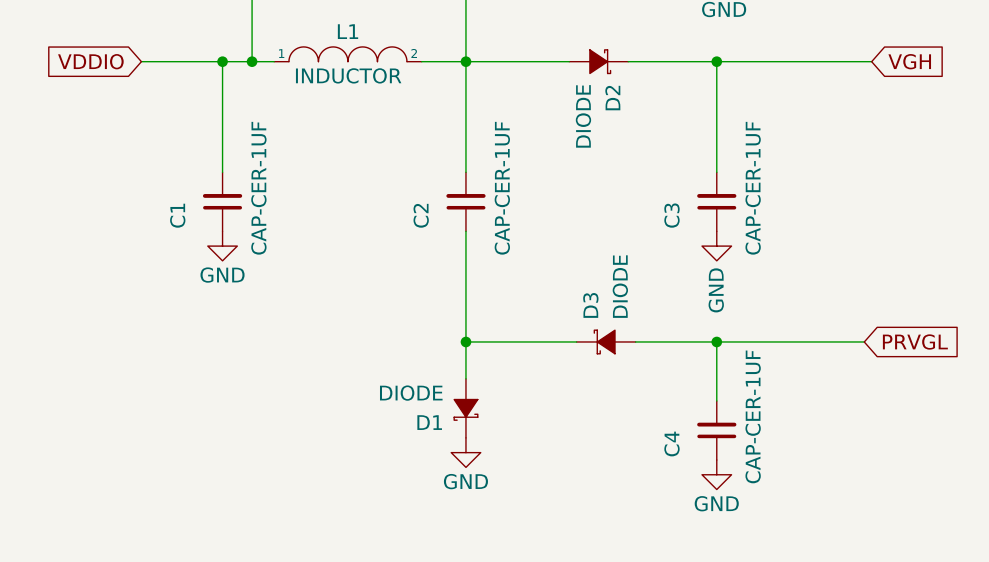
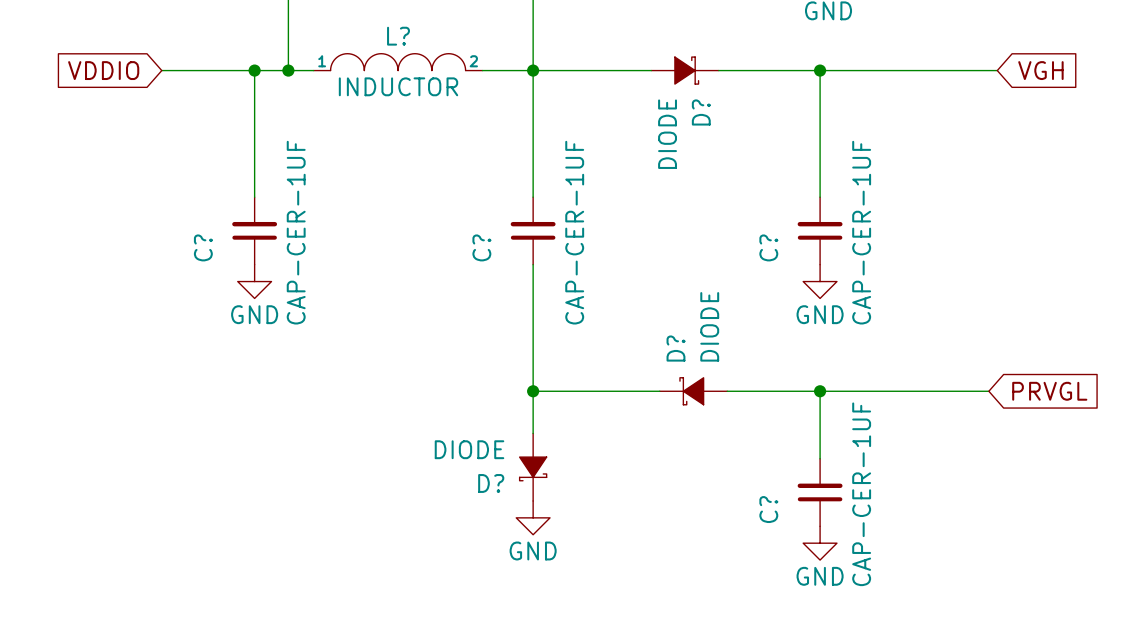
L1 name: L1 (348, 31) -> L? (398, 36)
D2 name: D2 (612, 98) -> D? (701, 112)
C1 name: C1 (177, 215) -> C? (203, 247)
C2 name: C2 (421, 215) -> C? (481, 247)
C3 name: C3 (671, 215) -> C? (768, 247)
power symbol text rotation: 0° (716, 290) -> 90° clockwise (820, 314)
D3 name: D3 (590, 305) -> D? (675, 348)
D1 name: D1 (429, 422) -> D? (491, 483)
C4 name: C4 (671, 444) -> C? (768, 509)

